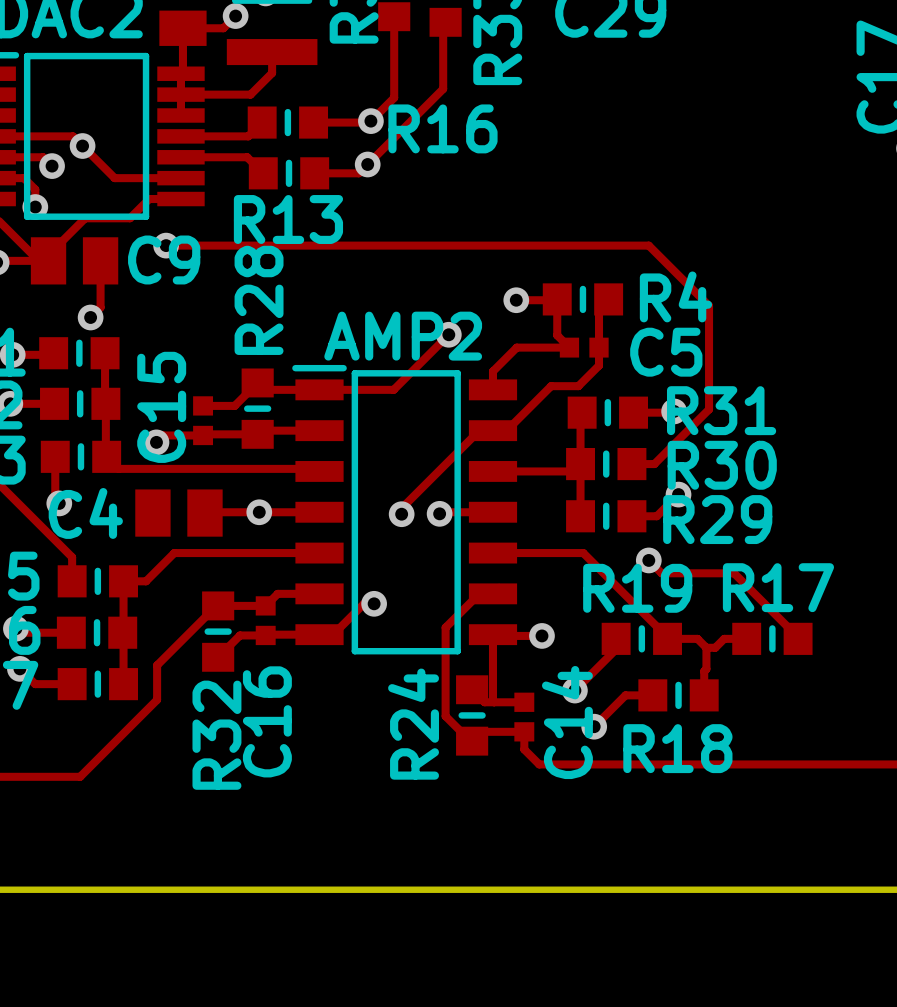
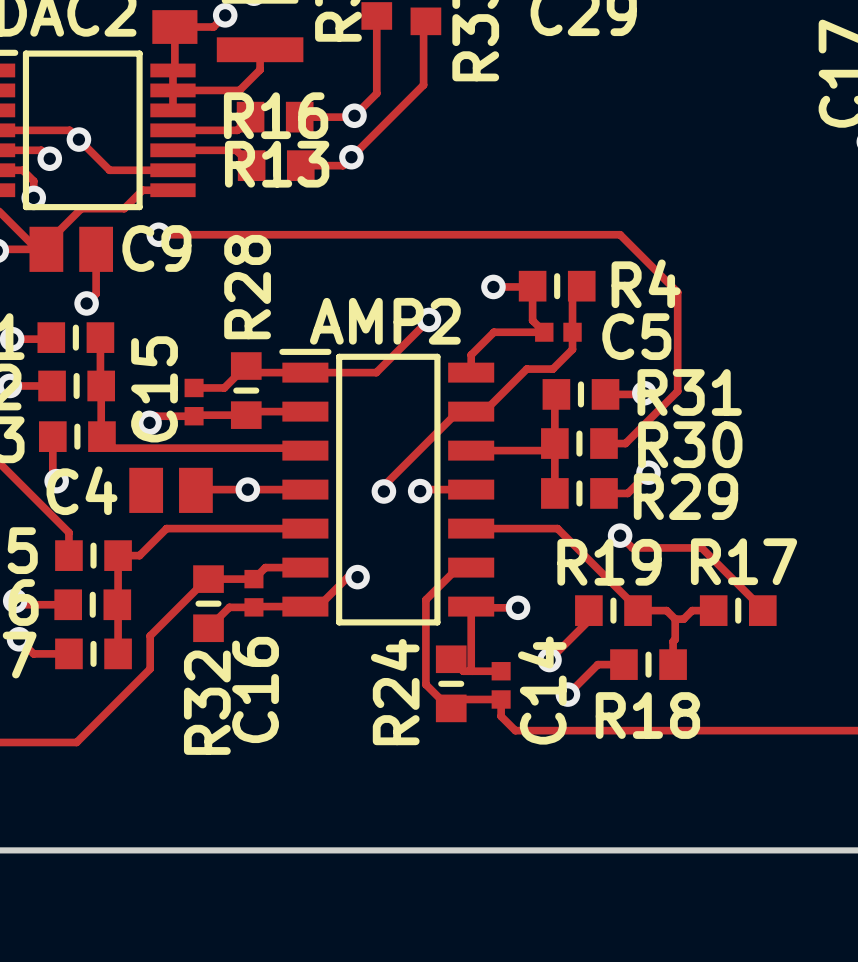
R16 name position: R16 (442, 128) -> R16 (276, 115)
R13 name position: R13 (288, 219) -> R13 (277, 164)

